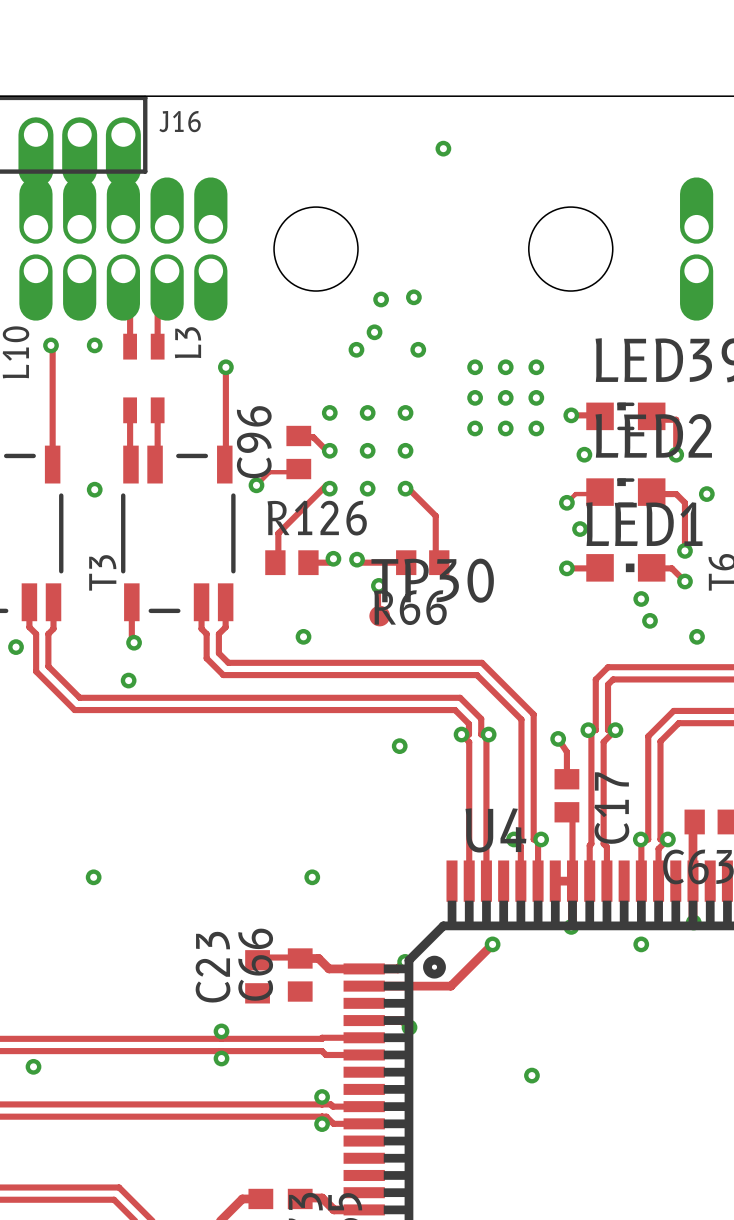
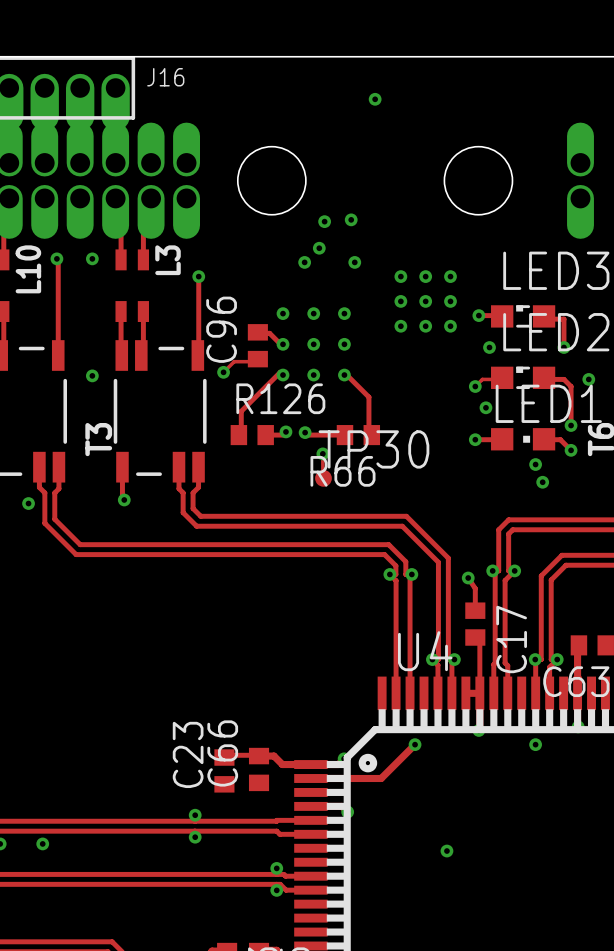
via: (303, 636) -> none
via: (697, 636) -> none
via: (128, 680) -> none
via: (399, 746) -> none
via: (93, 877) -> none
via: (312, 877) -> none

